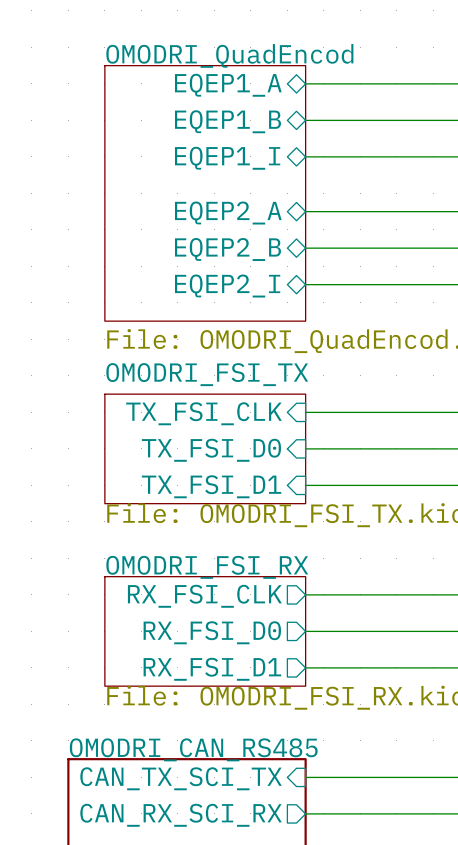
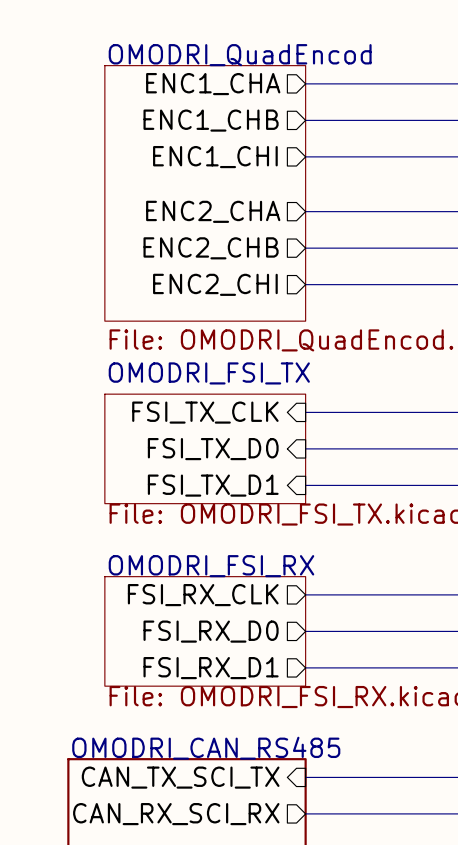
sheet pin shape: bidirectional (228, 85) -> output (213, 84)
sheet pin: EQEP1_A (228, 85) -> ENC1_CHA (213, 84)
sheet pin shape: bidirectional (227, 121) -> output (211, 120)
sheet pin: EQEP1_B (227, 121) -> ENC1_CHB (211, 120)
sheet pin shape: bidirectional (227, 158) -> output (215, 157)
sheet pin: EQEP1_I (227, 158) -> ENC1_CHI (215, 157)
sheet pin shape: bidirectional (228, 213) -> output (213, 211)
sheet pin: EQEP2_A (228, 213) -> ENC2_CHA (213, 211)
sheet pin shape: bidirectional (227, 249) -> output (211, 248)
sheet pin: EQEP2_B (227, 249) -> ENC2_CHB (211, 248)
sheet pin shape: bidirectional (227, 286) -> output (215, 284)
sheet pin: EQEP2_I (227, 286) -> ENC2_CHI (215, 284)
sheet pin: TX_FSI_CLK (204, 413) -> FSI_TX_CLK (205, 412)
sheet pin: TX_FSI_D0 (211, 450) -> FSI_TX_D0 (213, 449)
sheet pin: TX_FSI_D1 (211, 486) -> FSI_TX_D1 (213, 485)
sheet pin: RX_FSI_CLK (204, 596) -> FSI_RX_CLK (203, 595)
sheet pin: RX_FSI_D0 (212, 632) -> FSI_RX_D0 (211, 631)
sheet pin: RX_FSI_D1 (212, 669) -> FSI_RX_D1 (211, 668)

